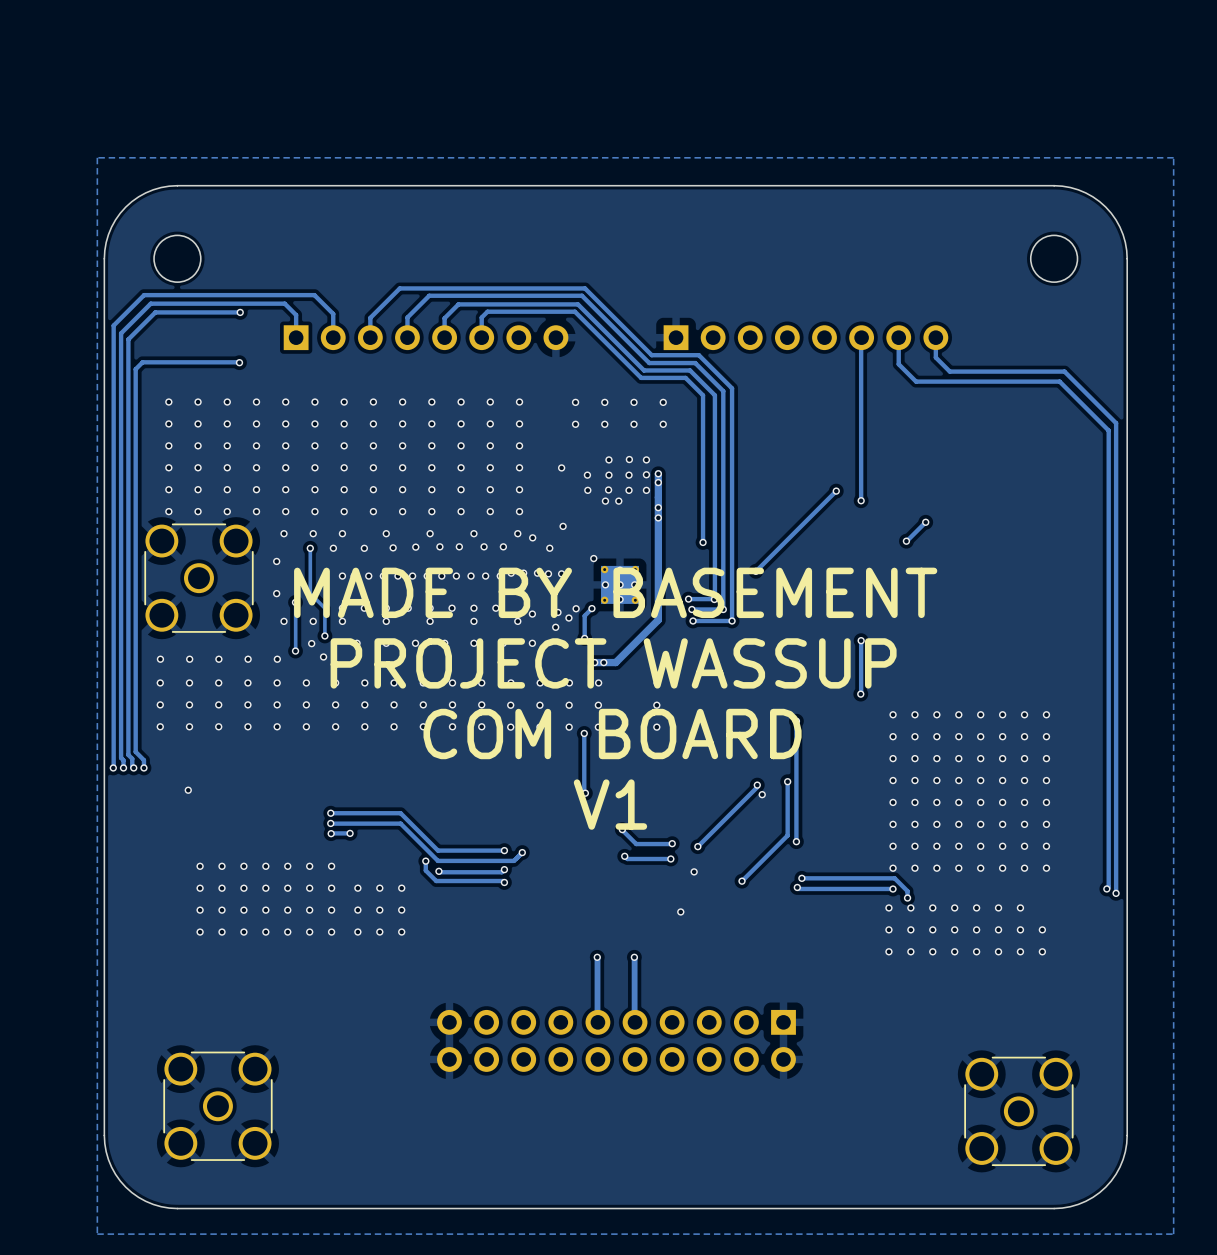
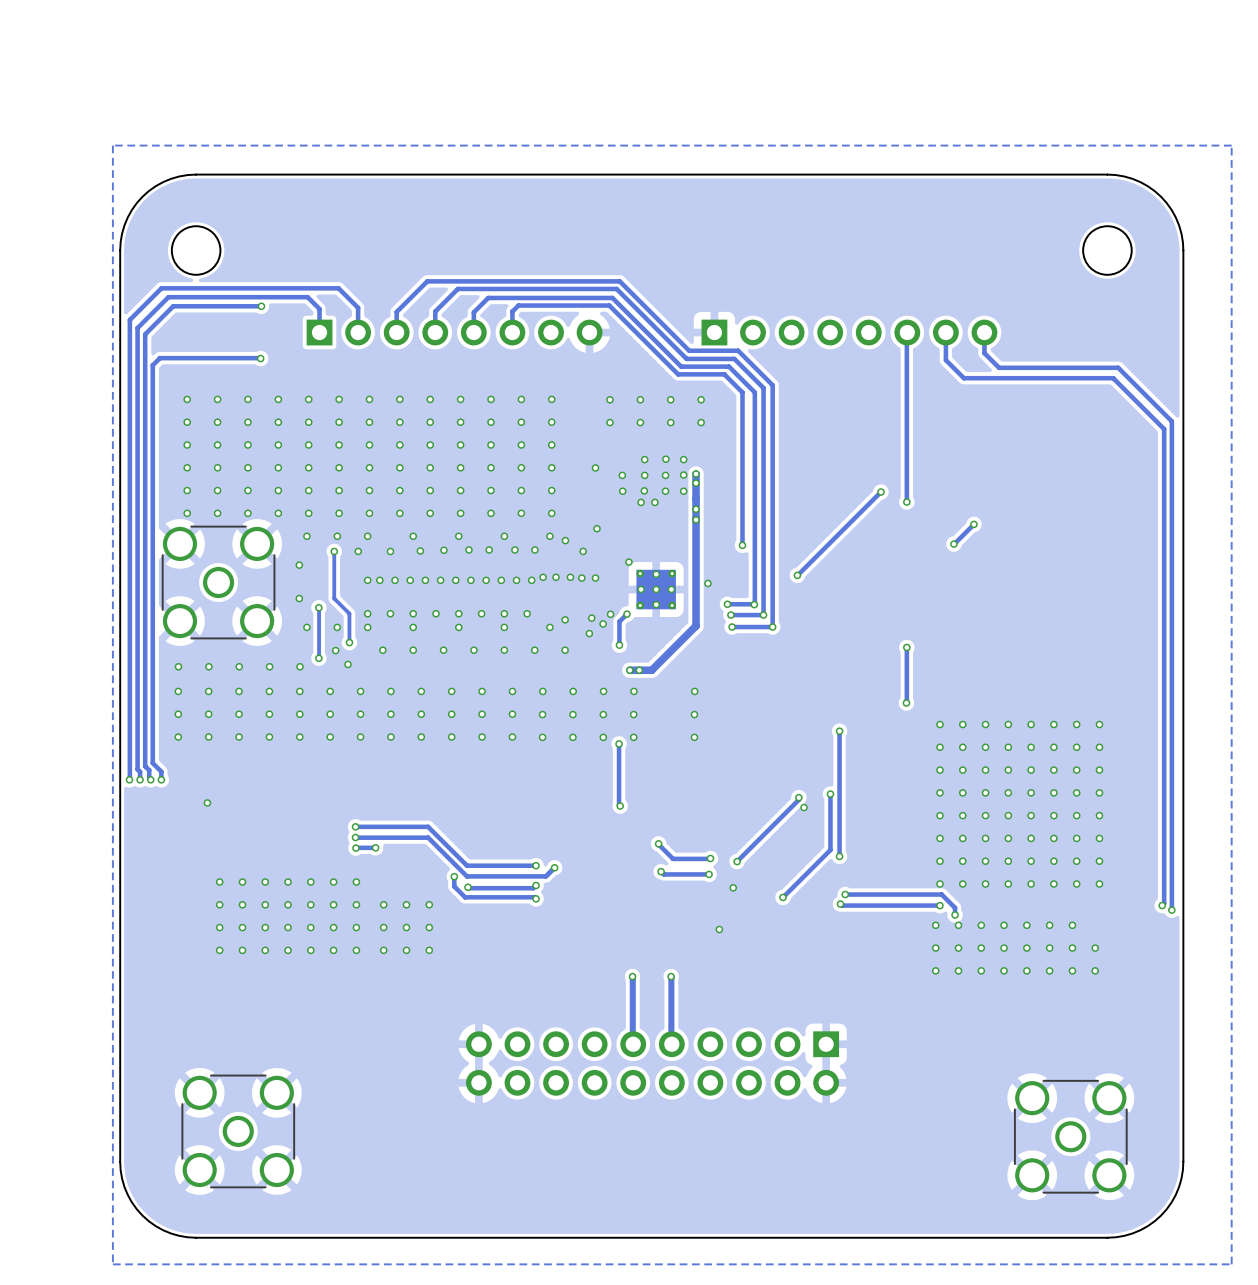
text: MADE BY BASEMENT (615, 592) -> none
text: PROJECT WASSUP (613, 663) -> none
text: COM BOARD (612, 734) -> none
text: V1 (610, 804) -> none

